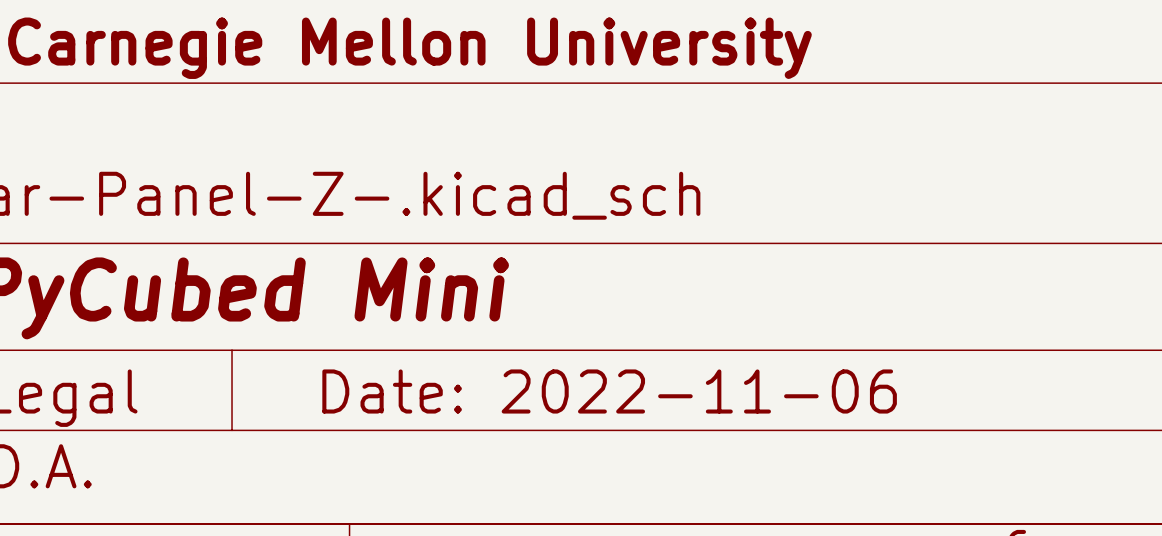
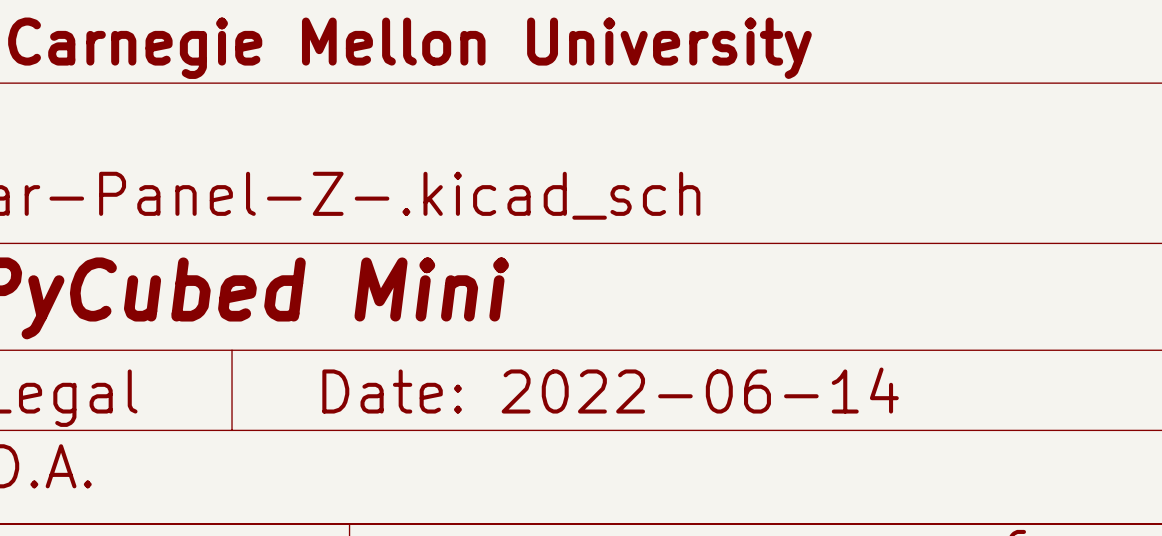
title block: Date: 2022-11-06 (609, 391) -> Date: 2022-06-14 (610, 390)

